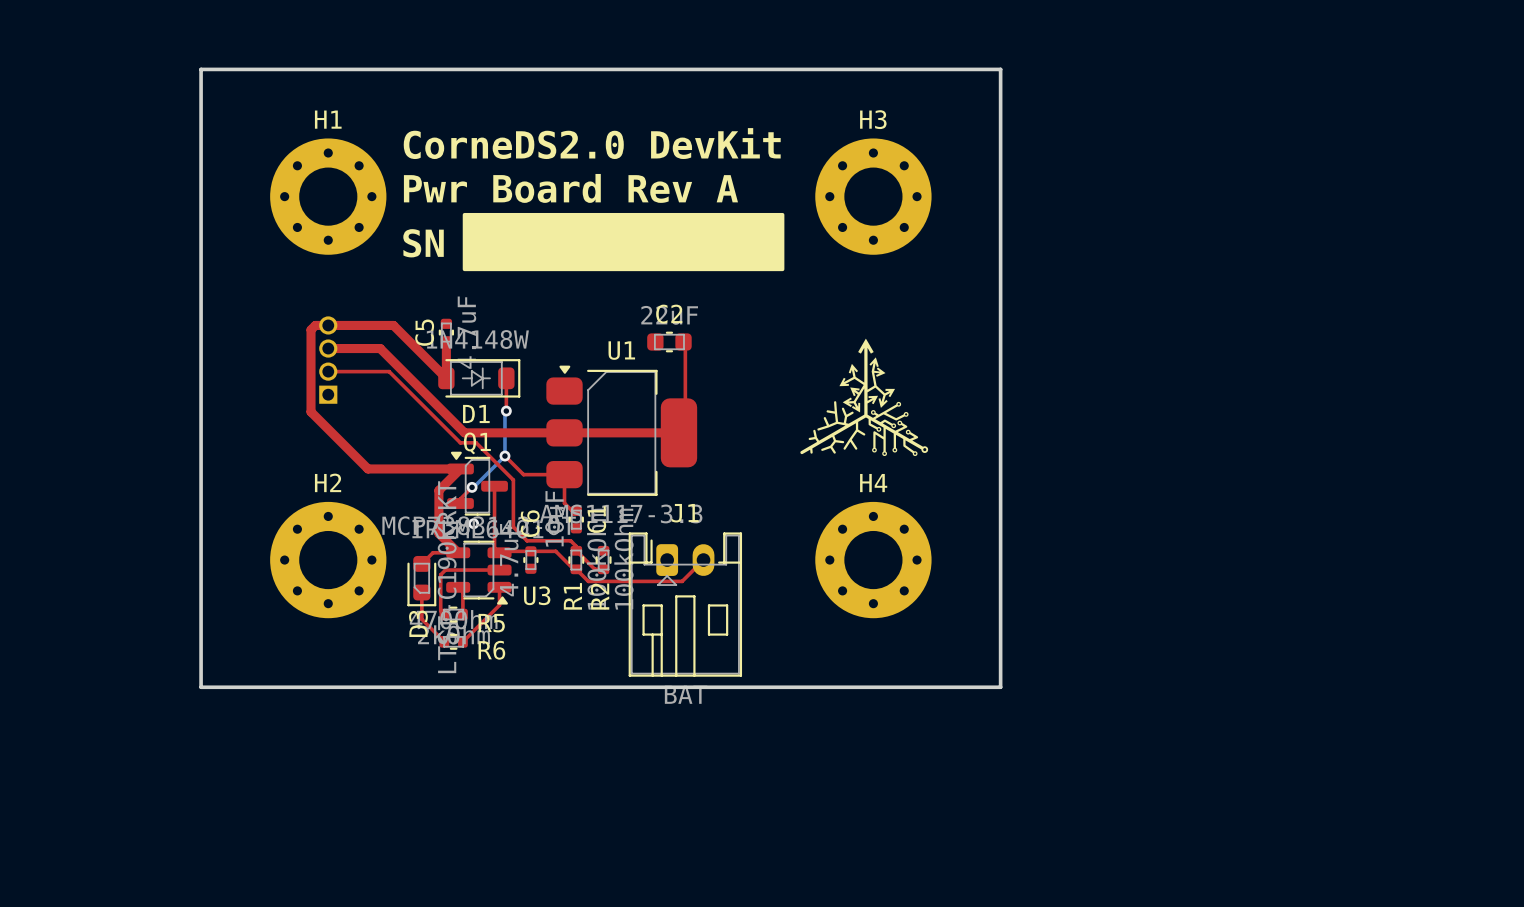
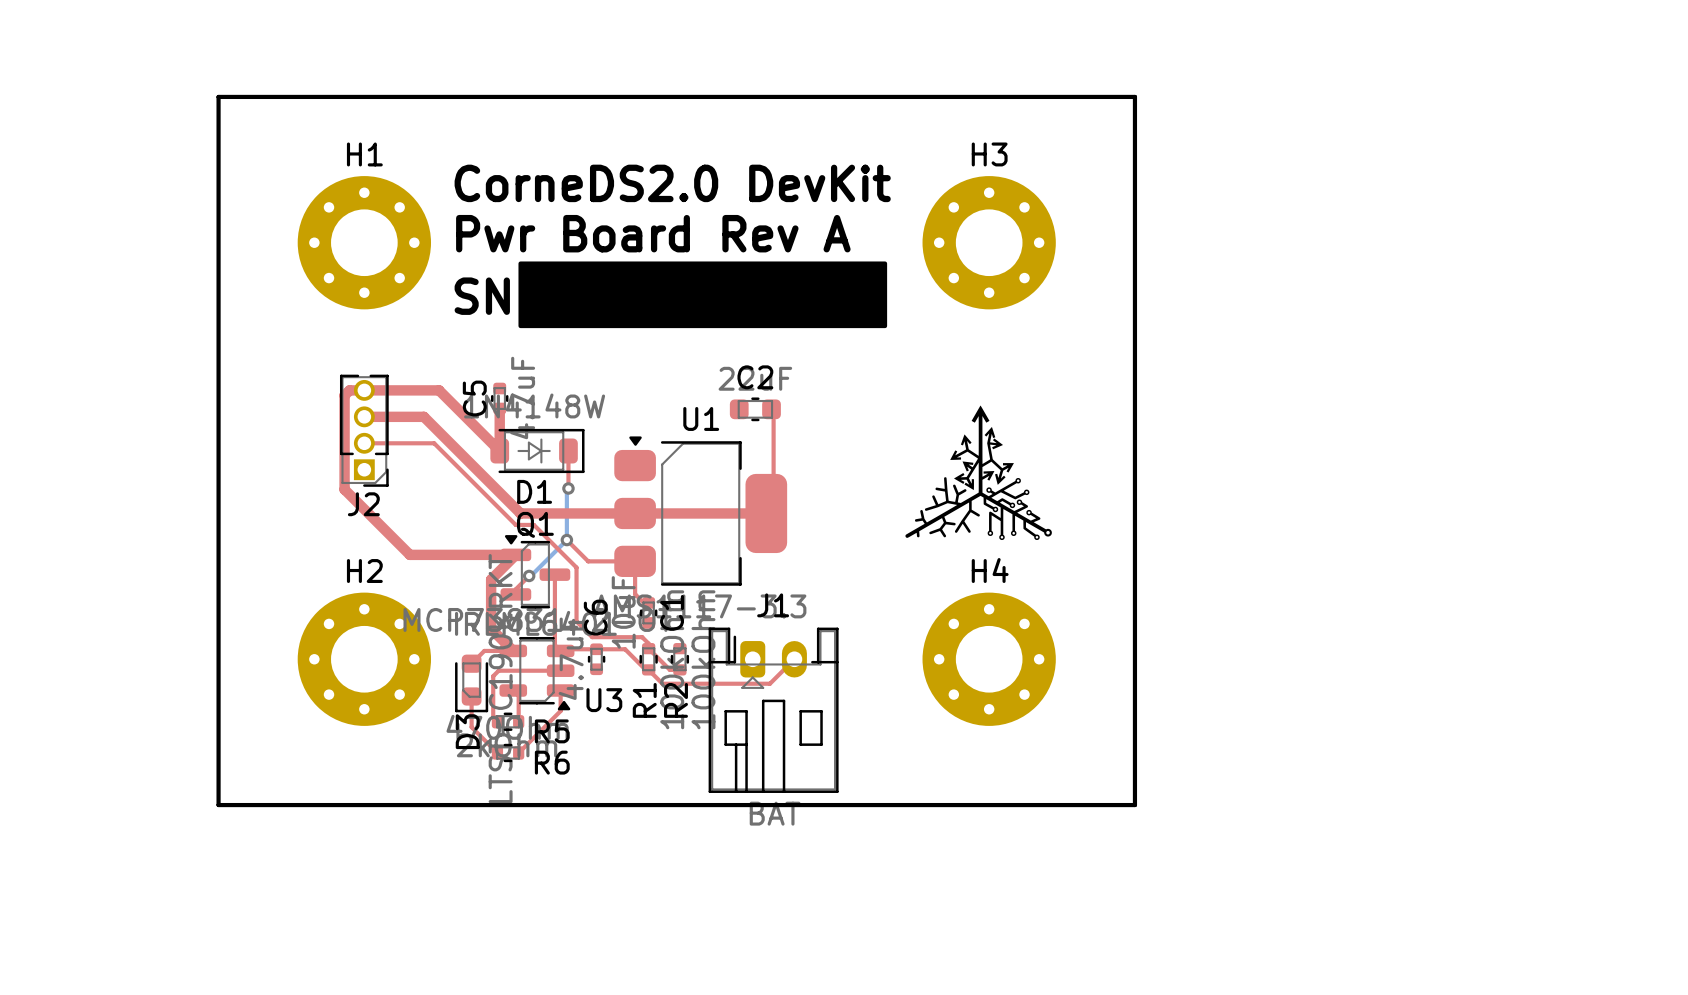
J2 side: bottom (328, 360) -> top (364, 430)

